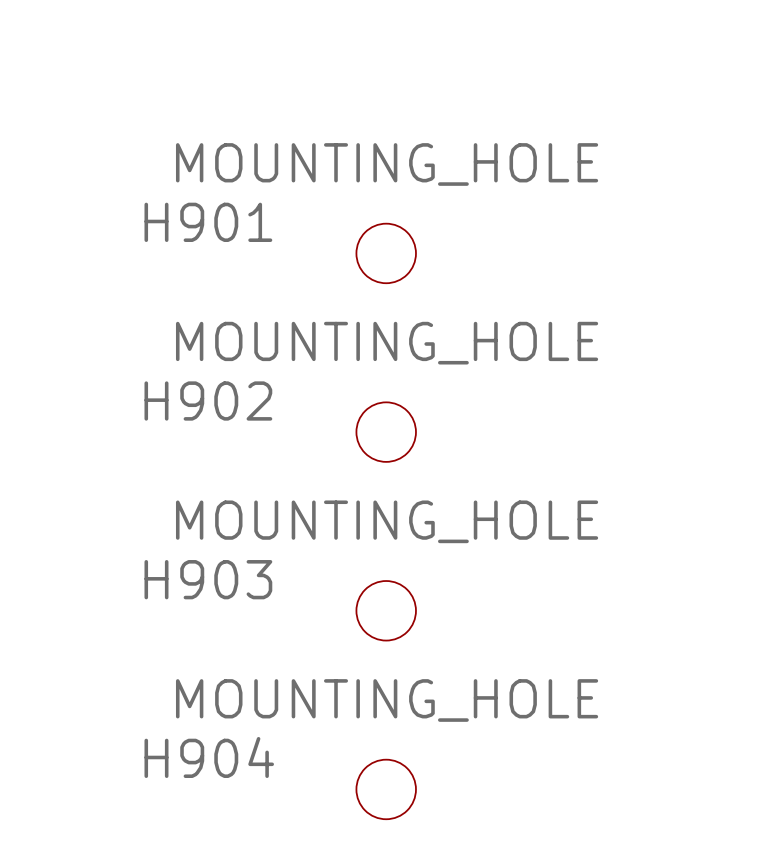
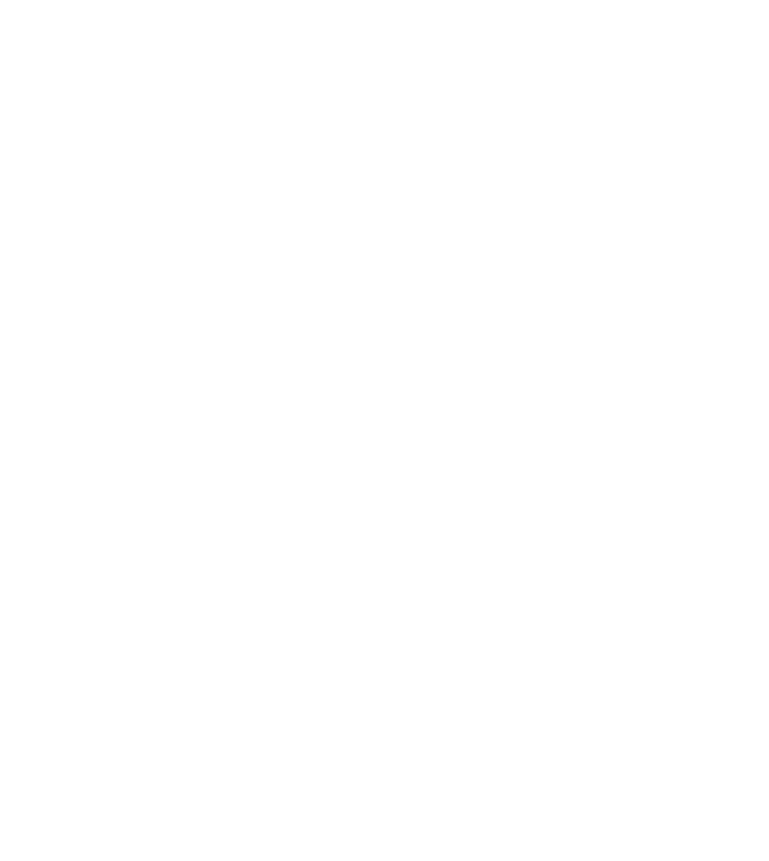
H901: MOUNTING_HOLE (386, 253) -> none
H902: MOUNTING_HOLE (386, 432) -> none
H903: MOUNTING_HOLE (386, 610) -> none
H904: MOUNTING_HOLE (386, 789) -> none

